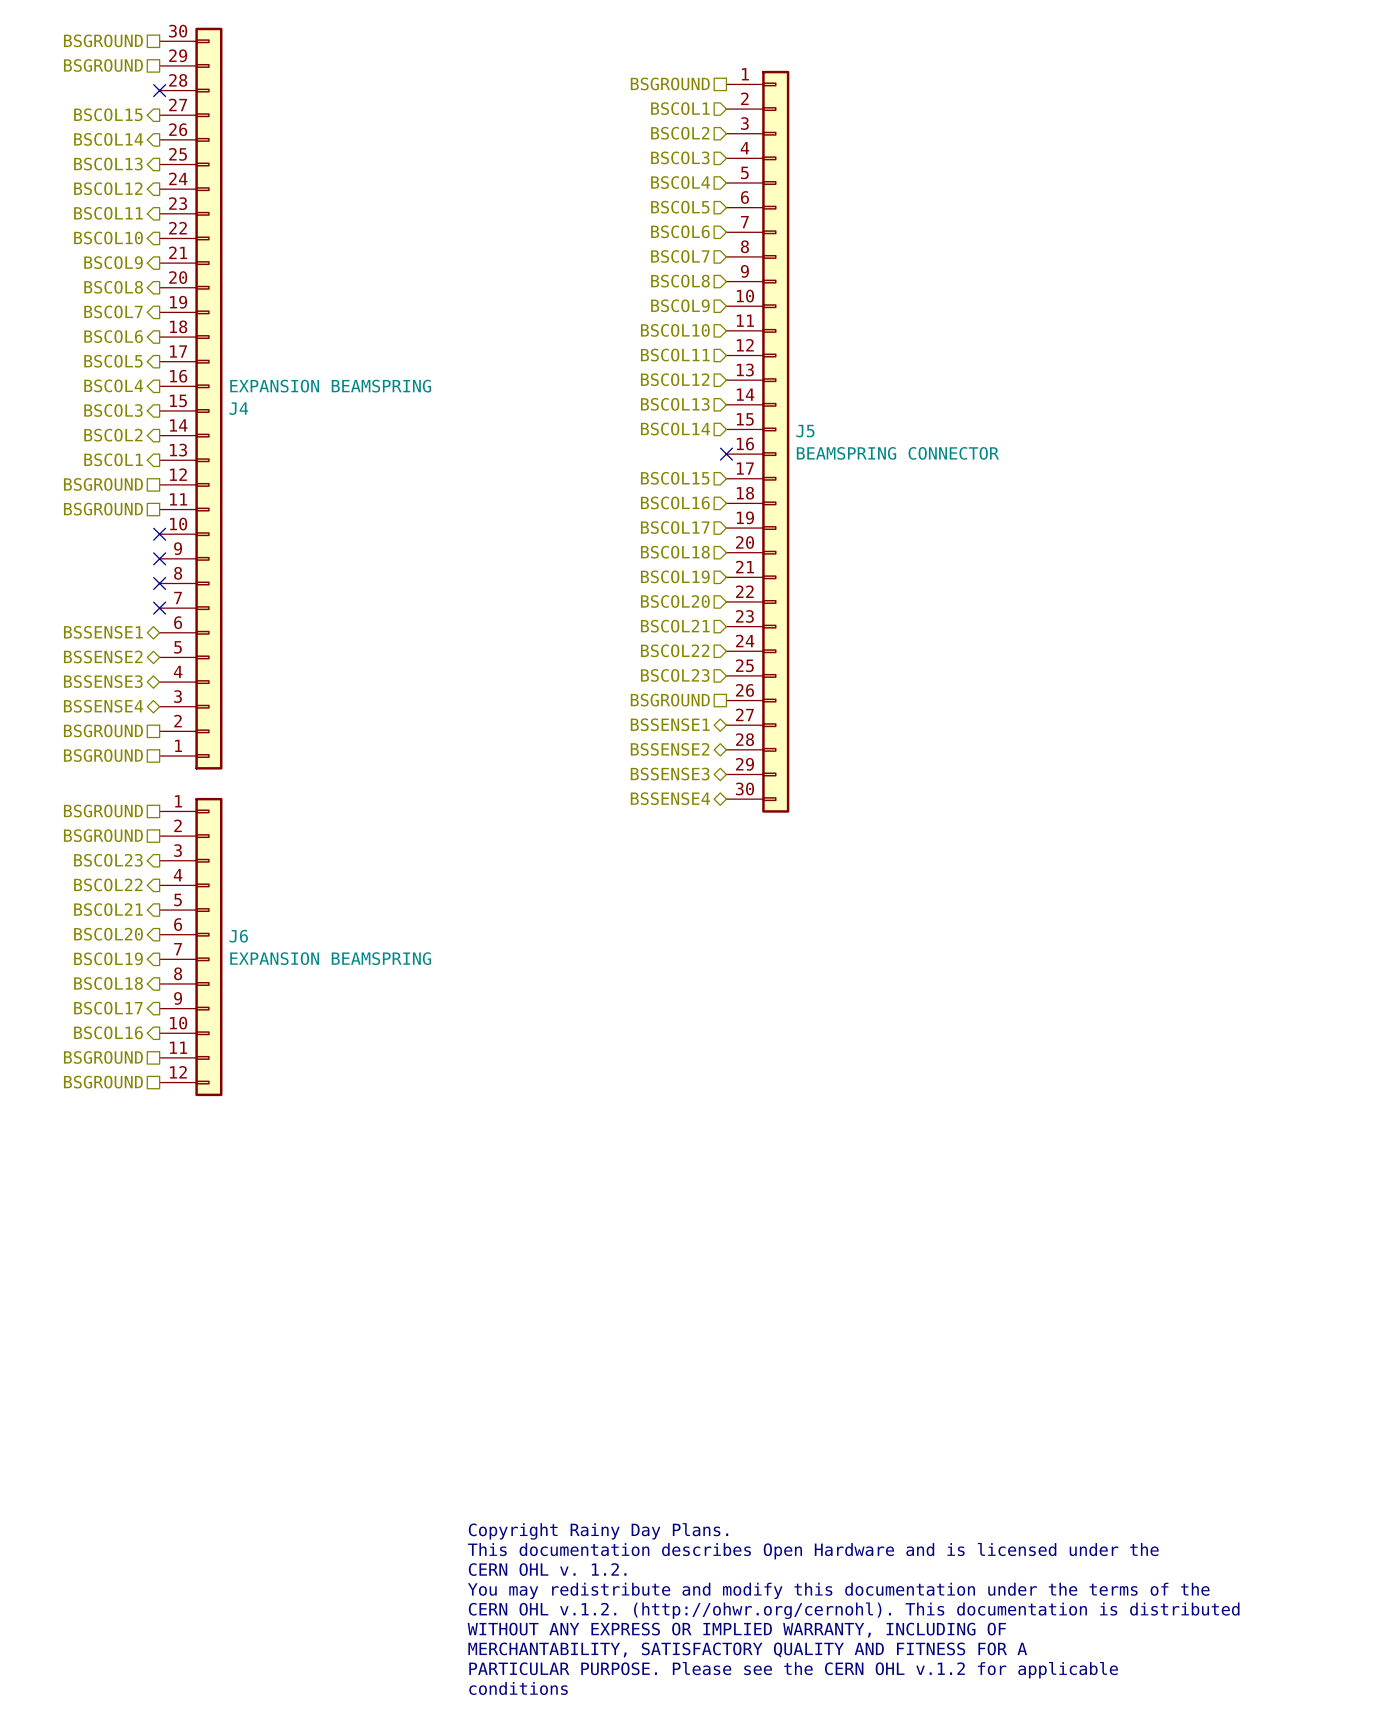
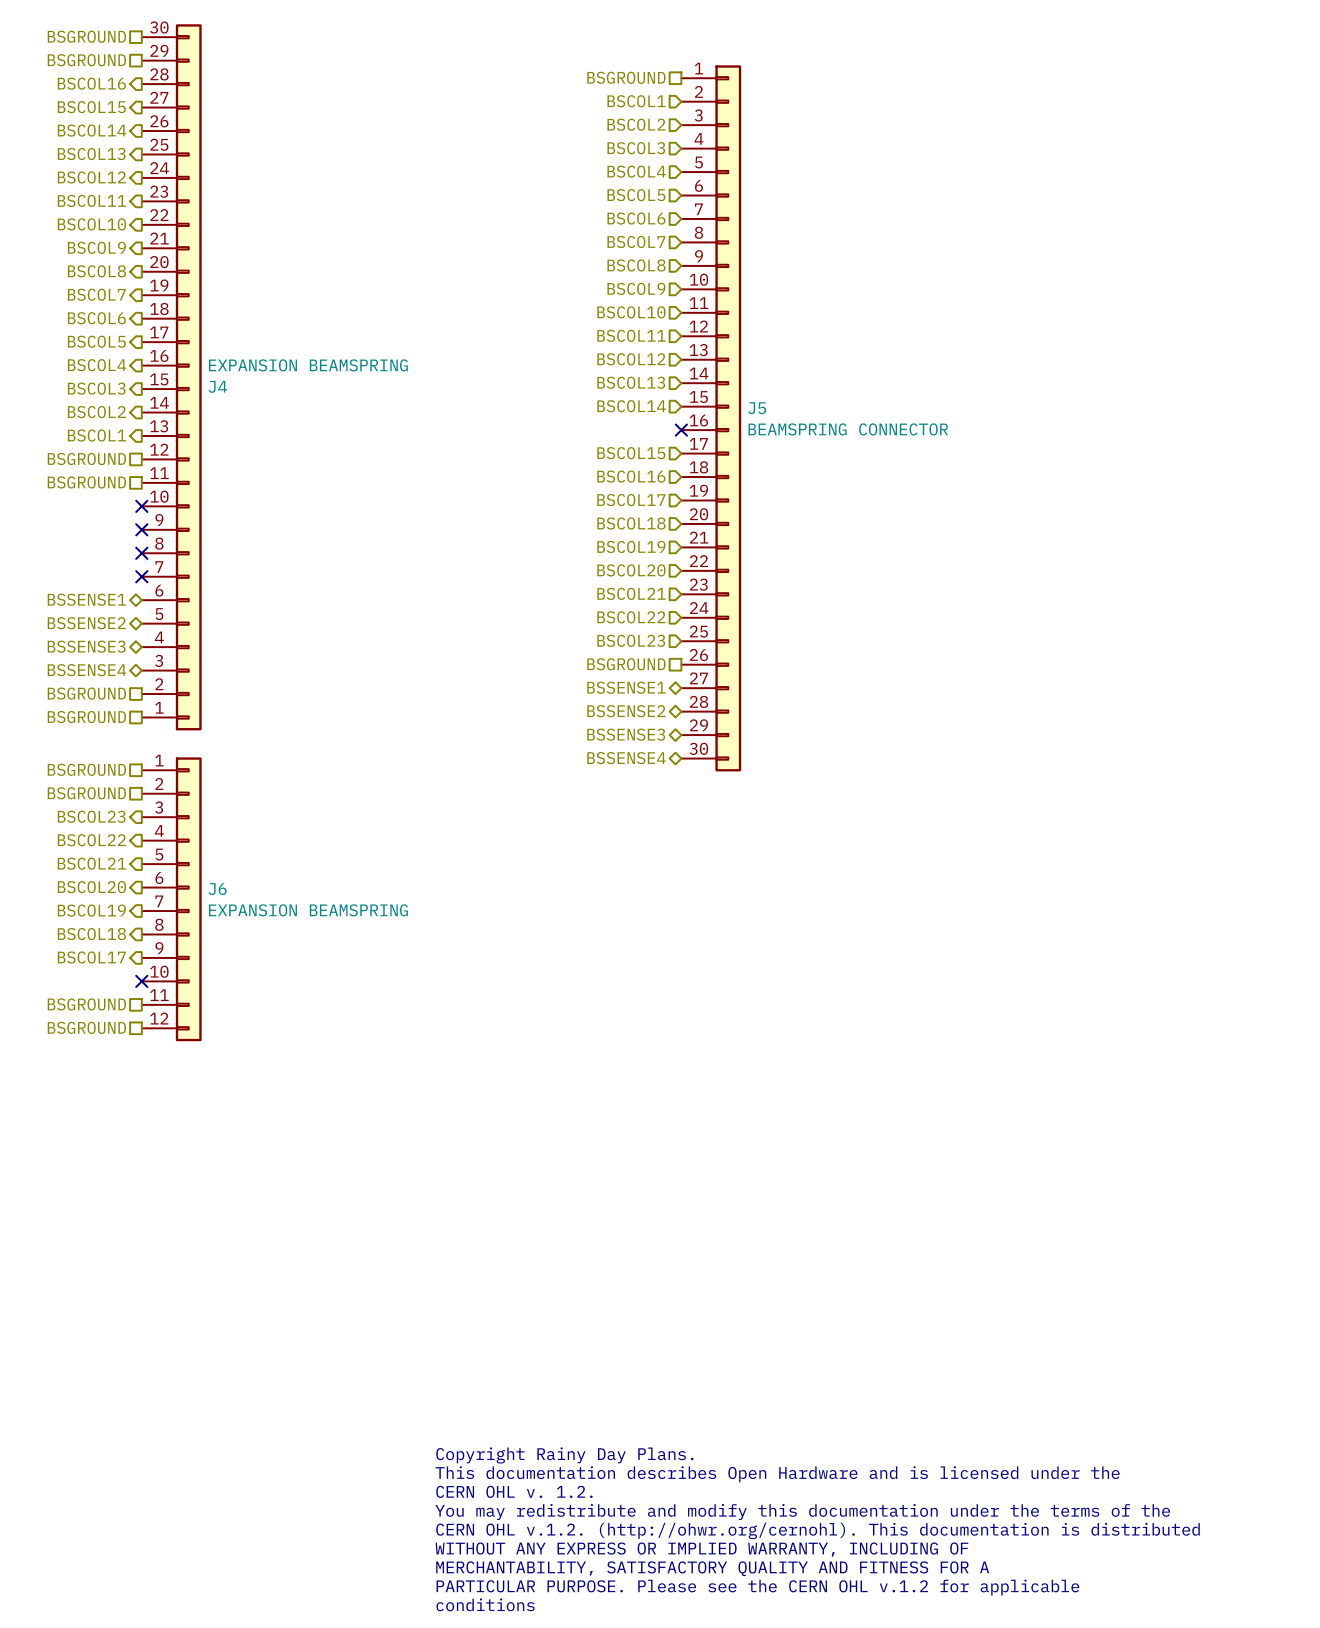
hierarchical label: none -> BSCOL16 (91, 83)
no-connect mark: (159, 90) -> none
hierarchical label: BSCOL16 (108, 1032) -> none
no-connect mark: none -> (141, 981)

